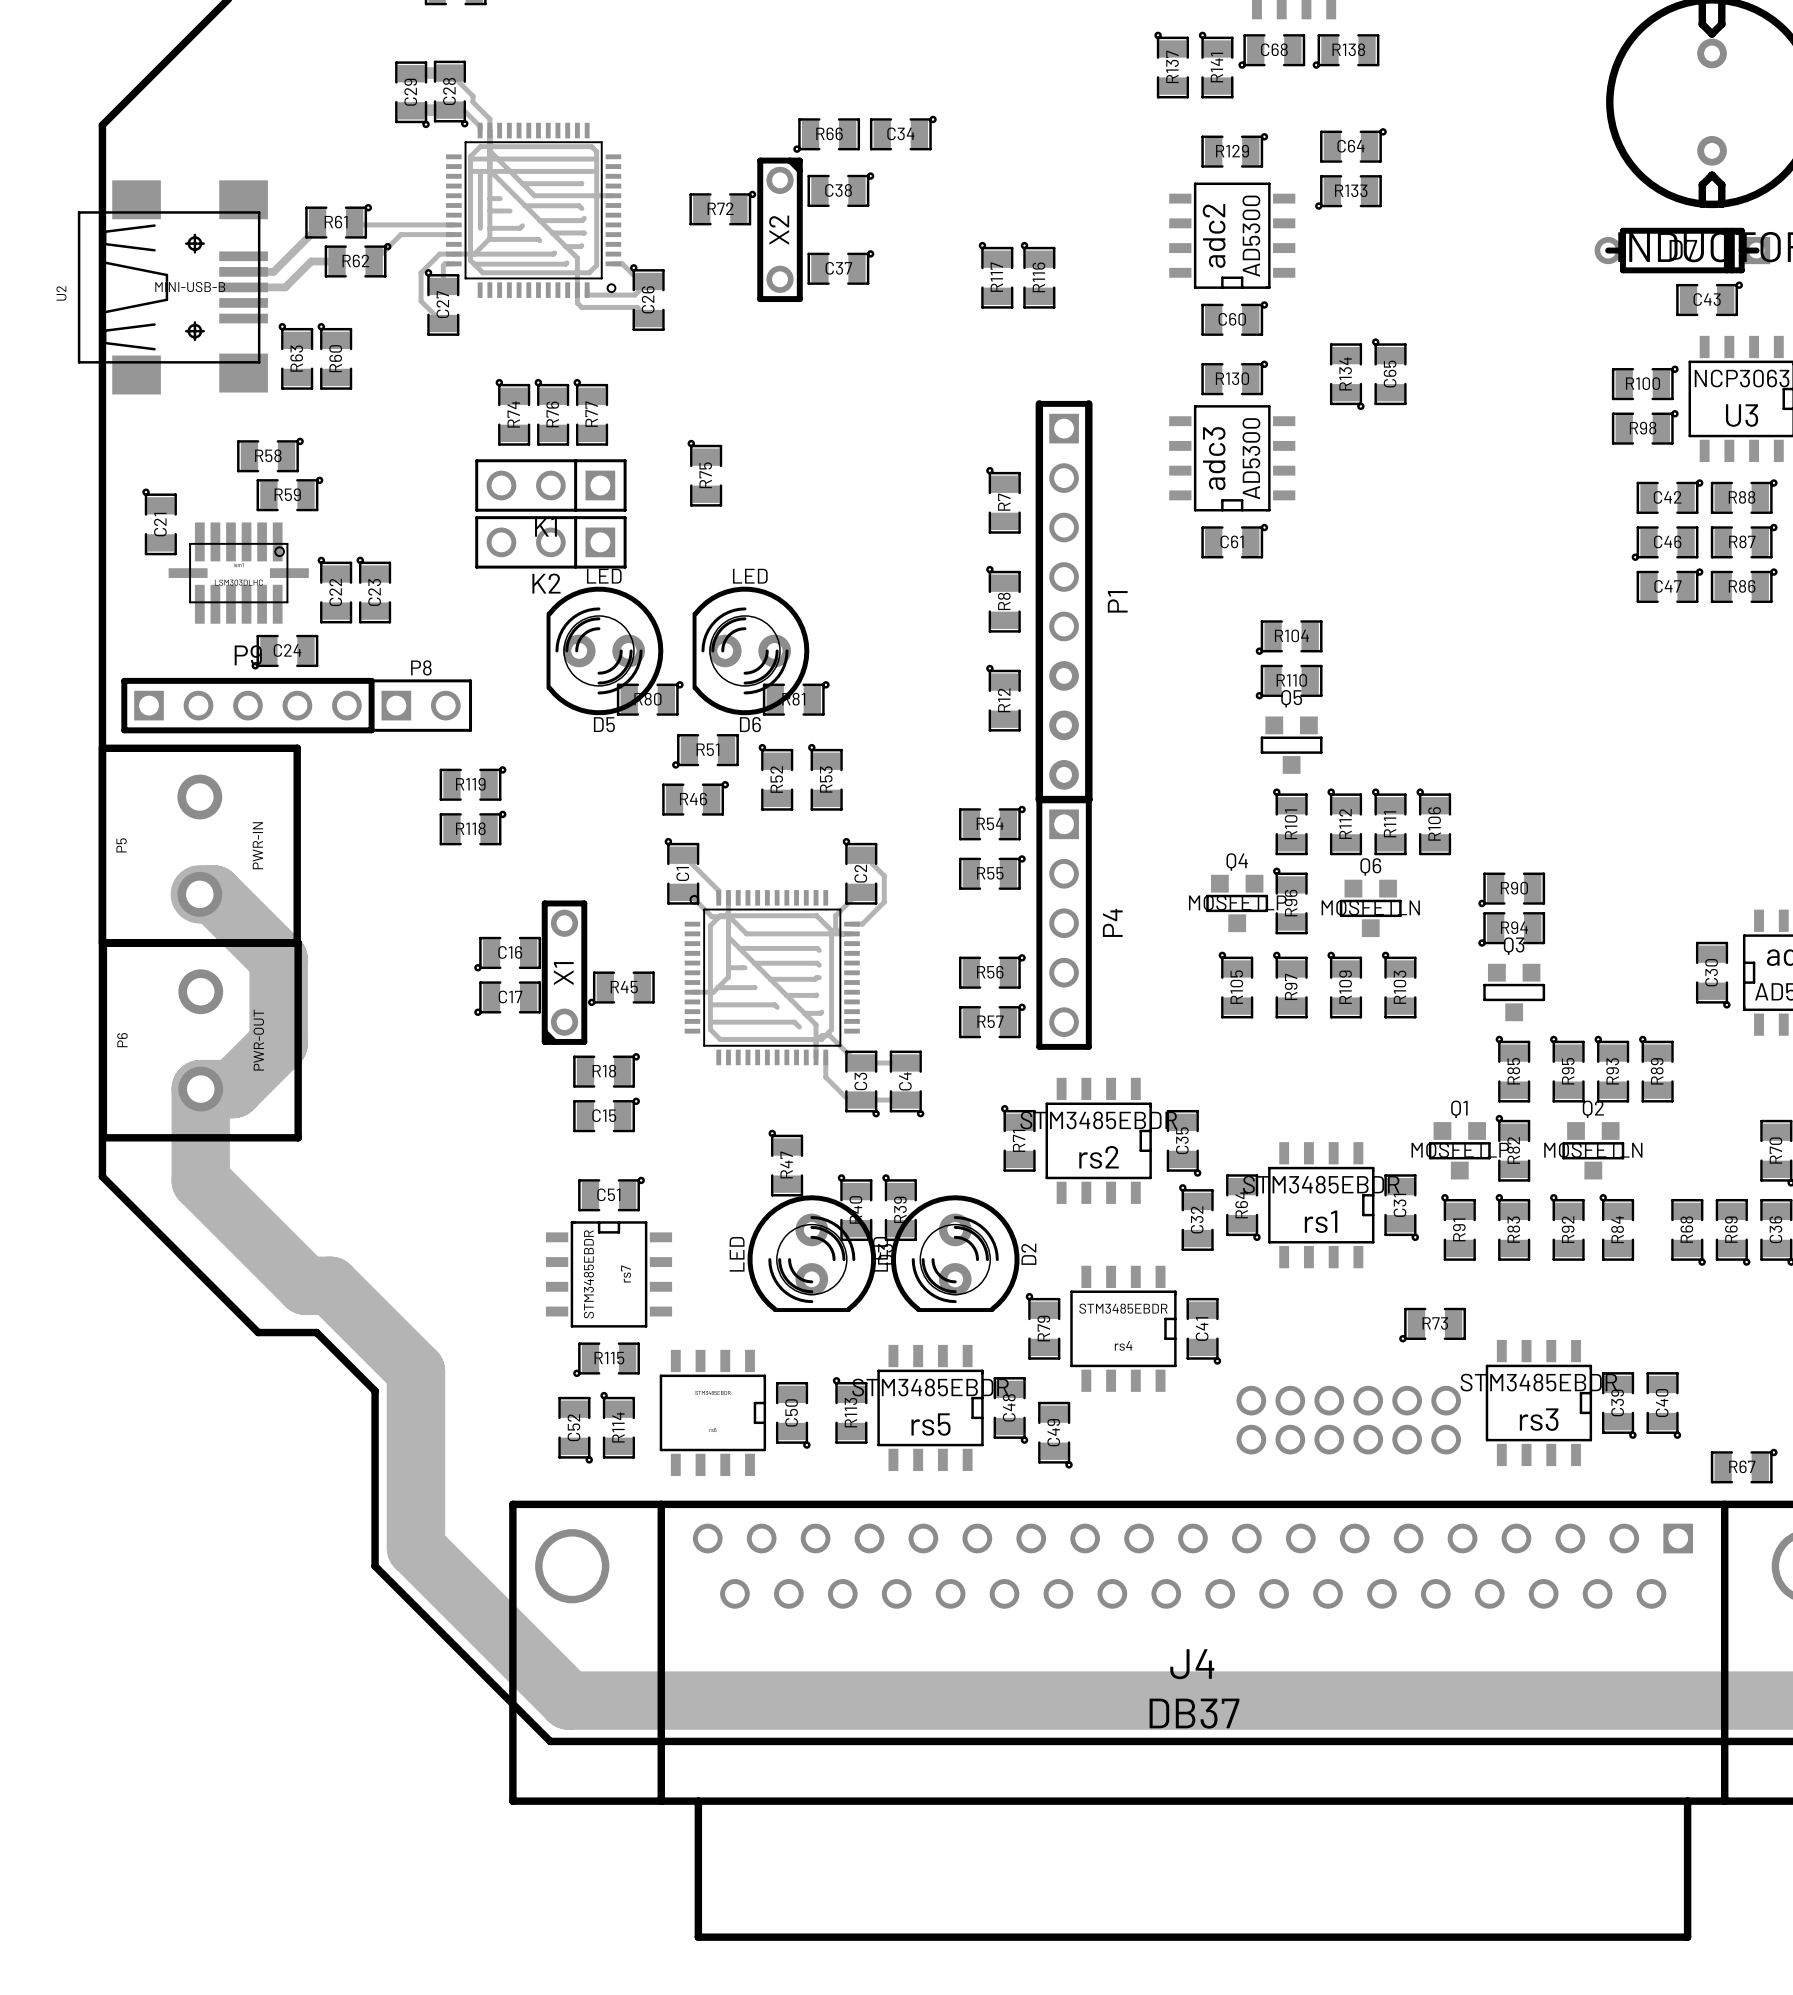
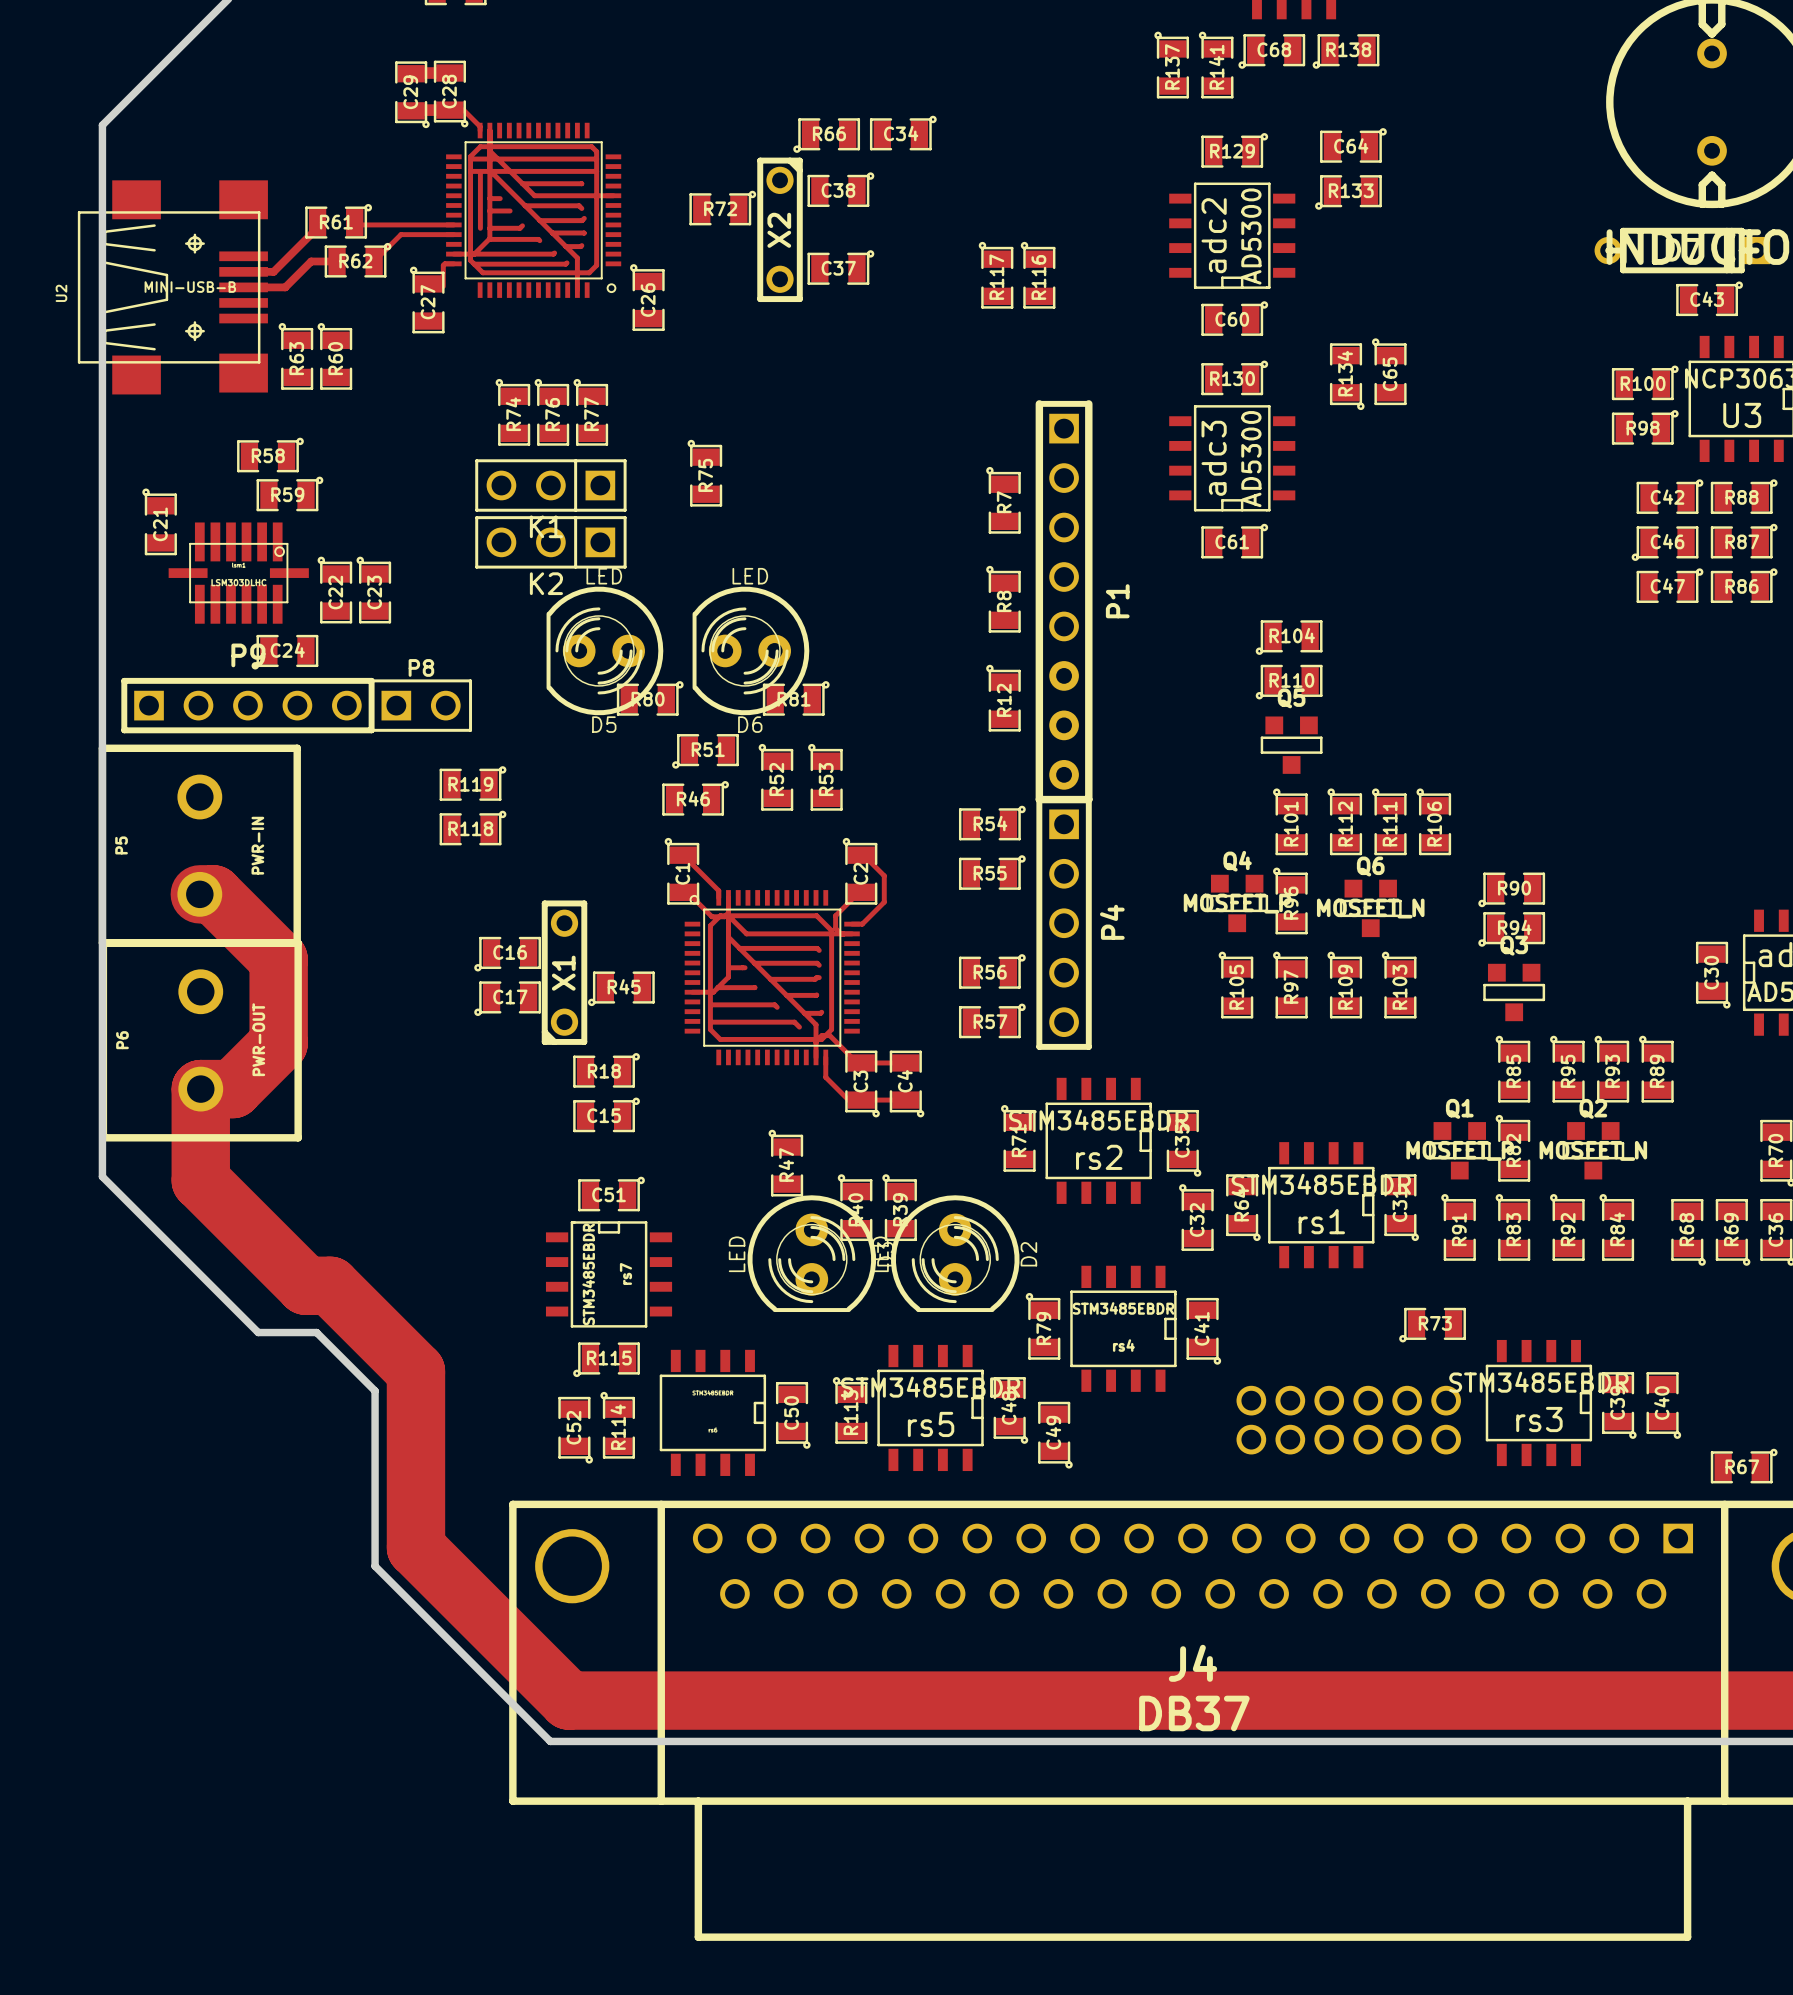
track: (449, 73) (473, 96) (473, 102) (489, 119) (489, 130) -> none
track: (453, 254) (439, 254) (421, 272) (421, 301) (443, 323) -> none
track: (613, 263) (622, 263) (639, 281) (648, 281) (634, 295) (587, 295) (587, 290) -> none
track: (577, 290) (577, 303) (581, 307) (637, 307) (648, 318) -> none
C27 position: (442, 302) -> (427, 300)

